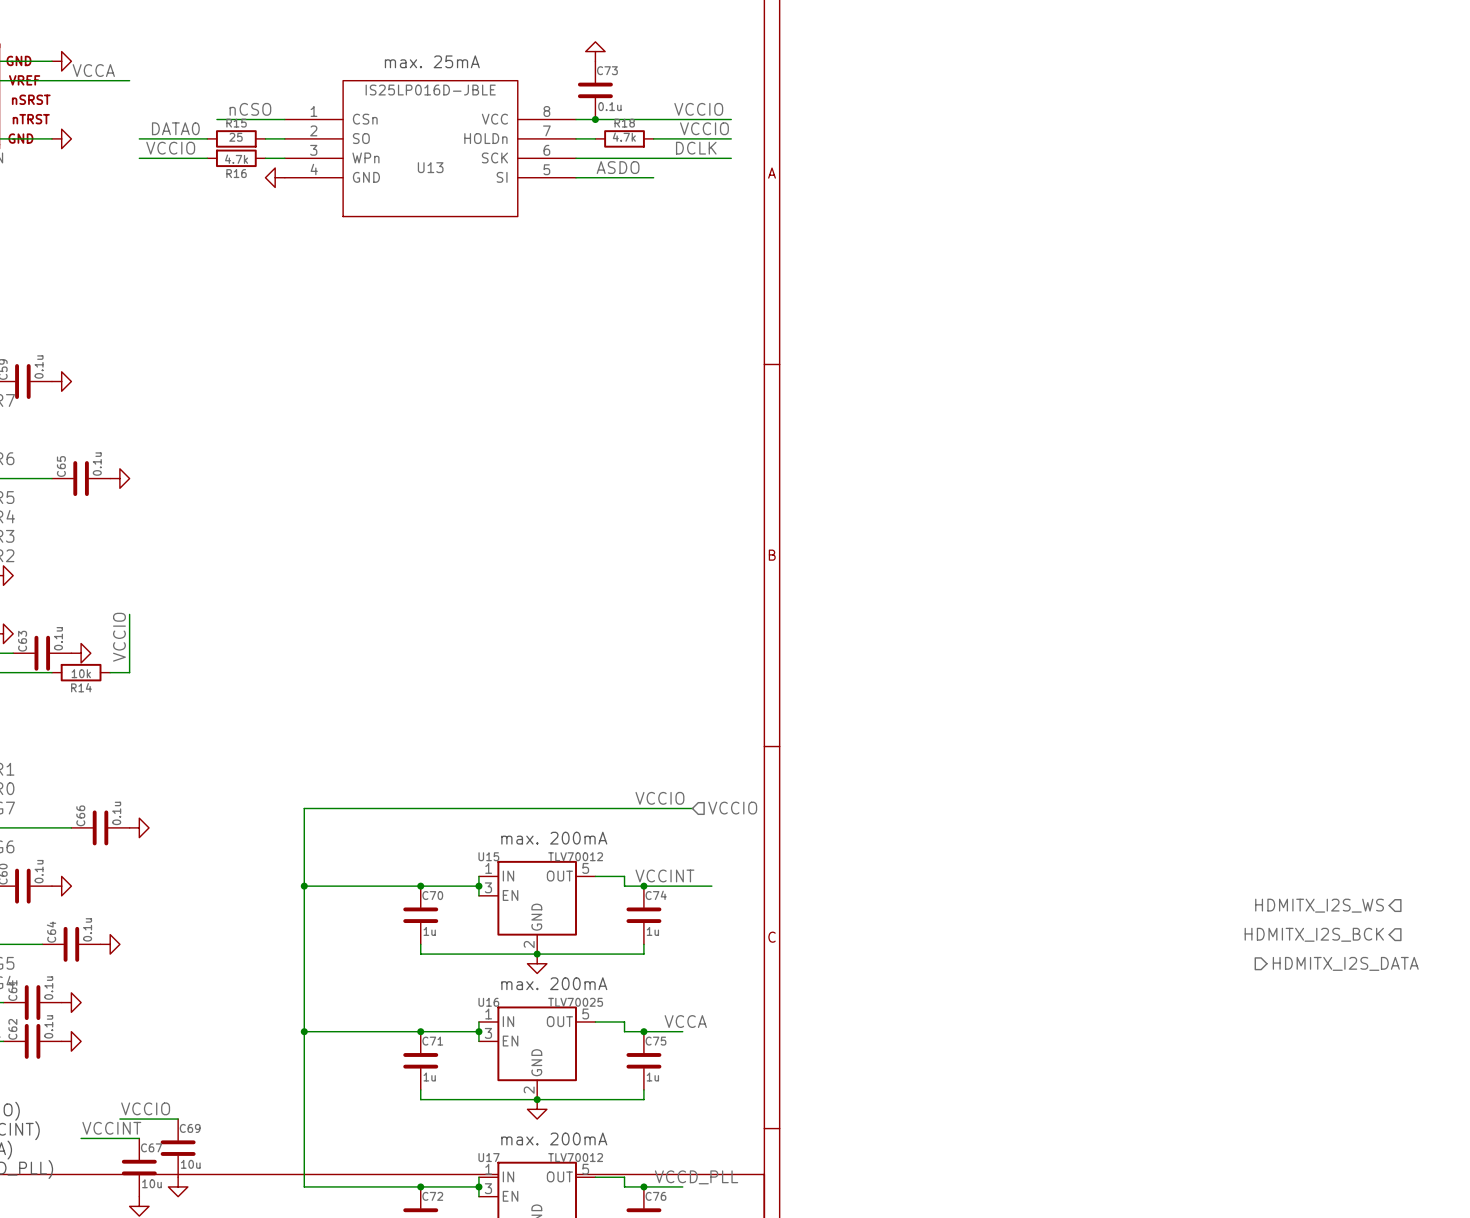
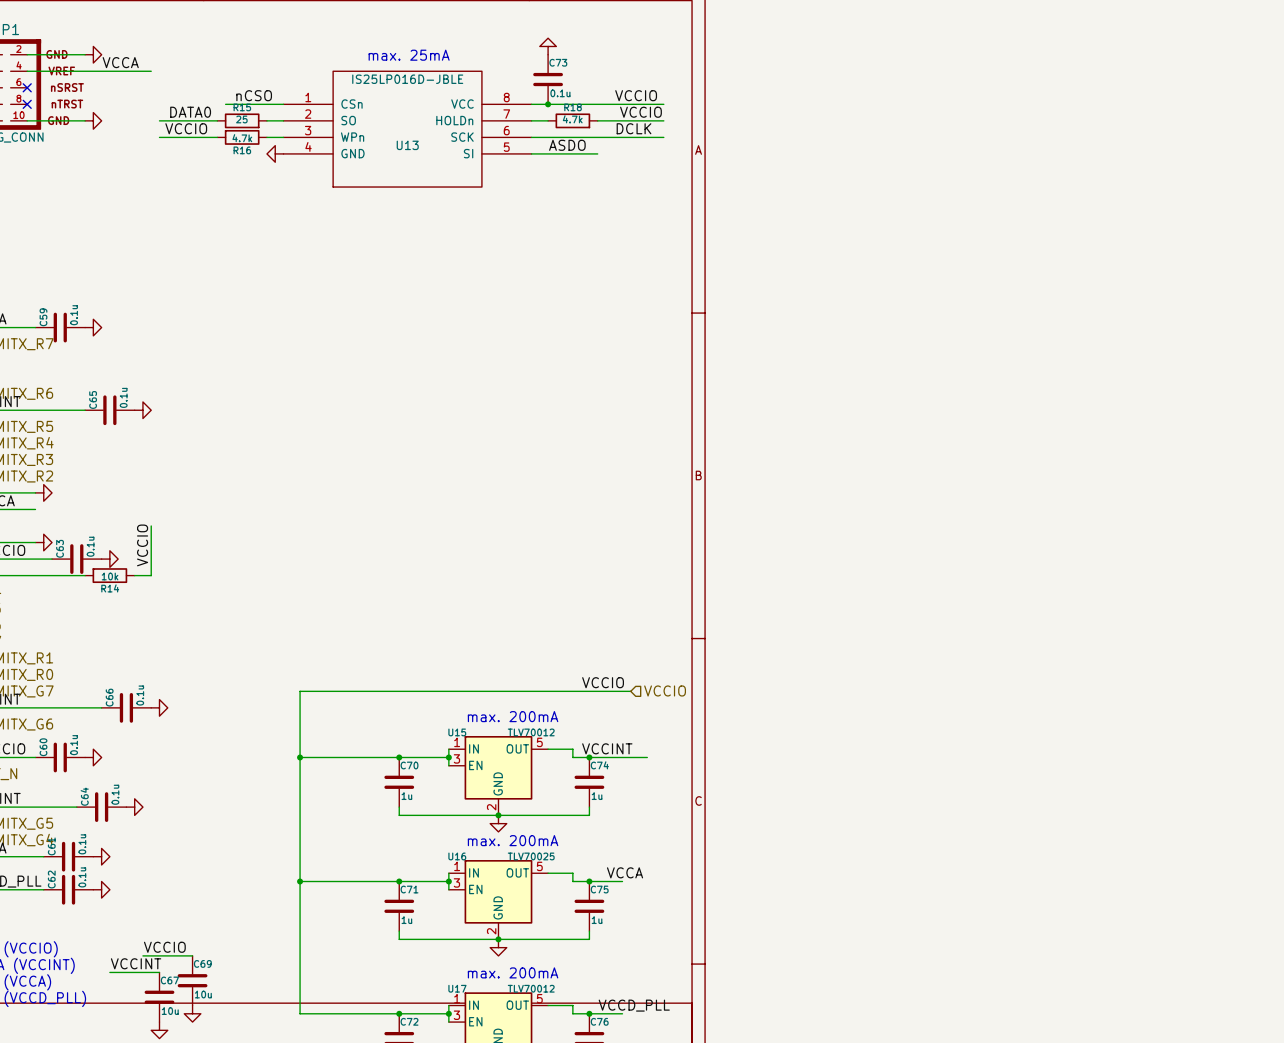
hierarchical label: HDMITX_I2S_WS (1319, 905) -> none
hierarchical label: HDMITX_I2S_BCK (1314, 934) -> none
hierarchical label: HDMITX_I2S_DATA (1345, 963) -> none

